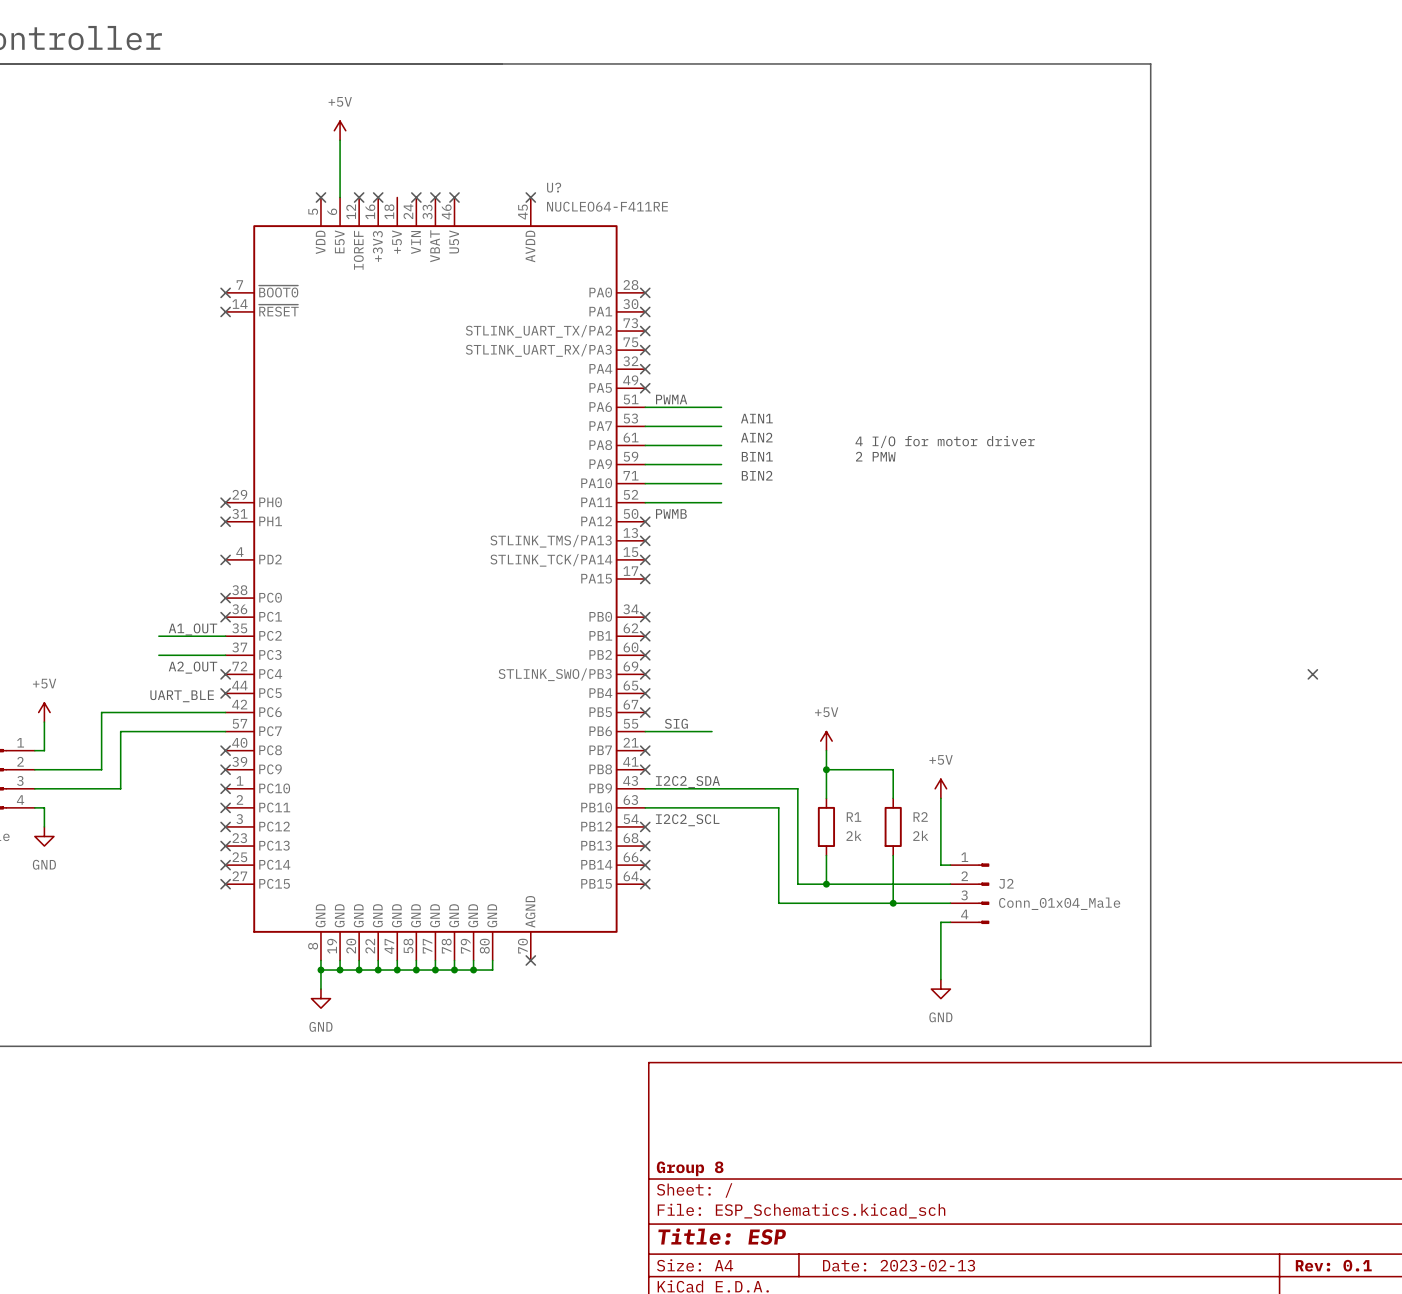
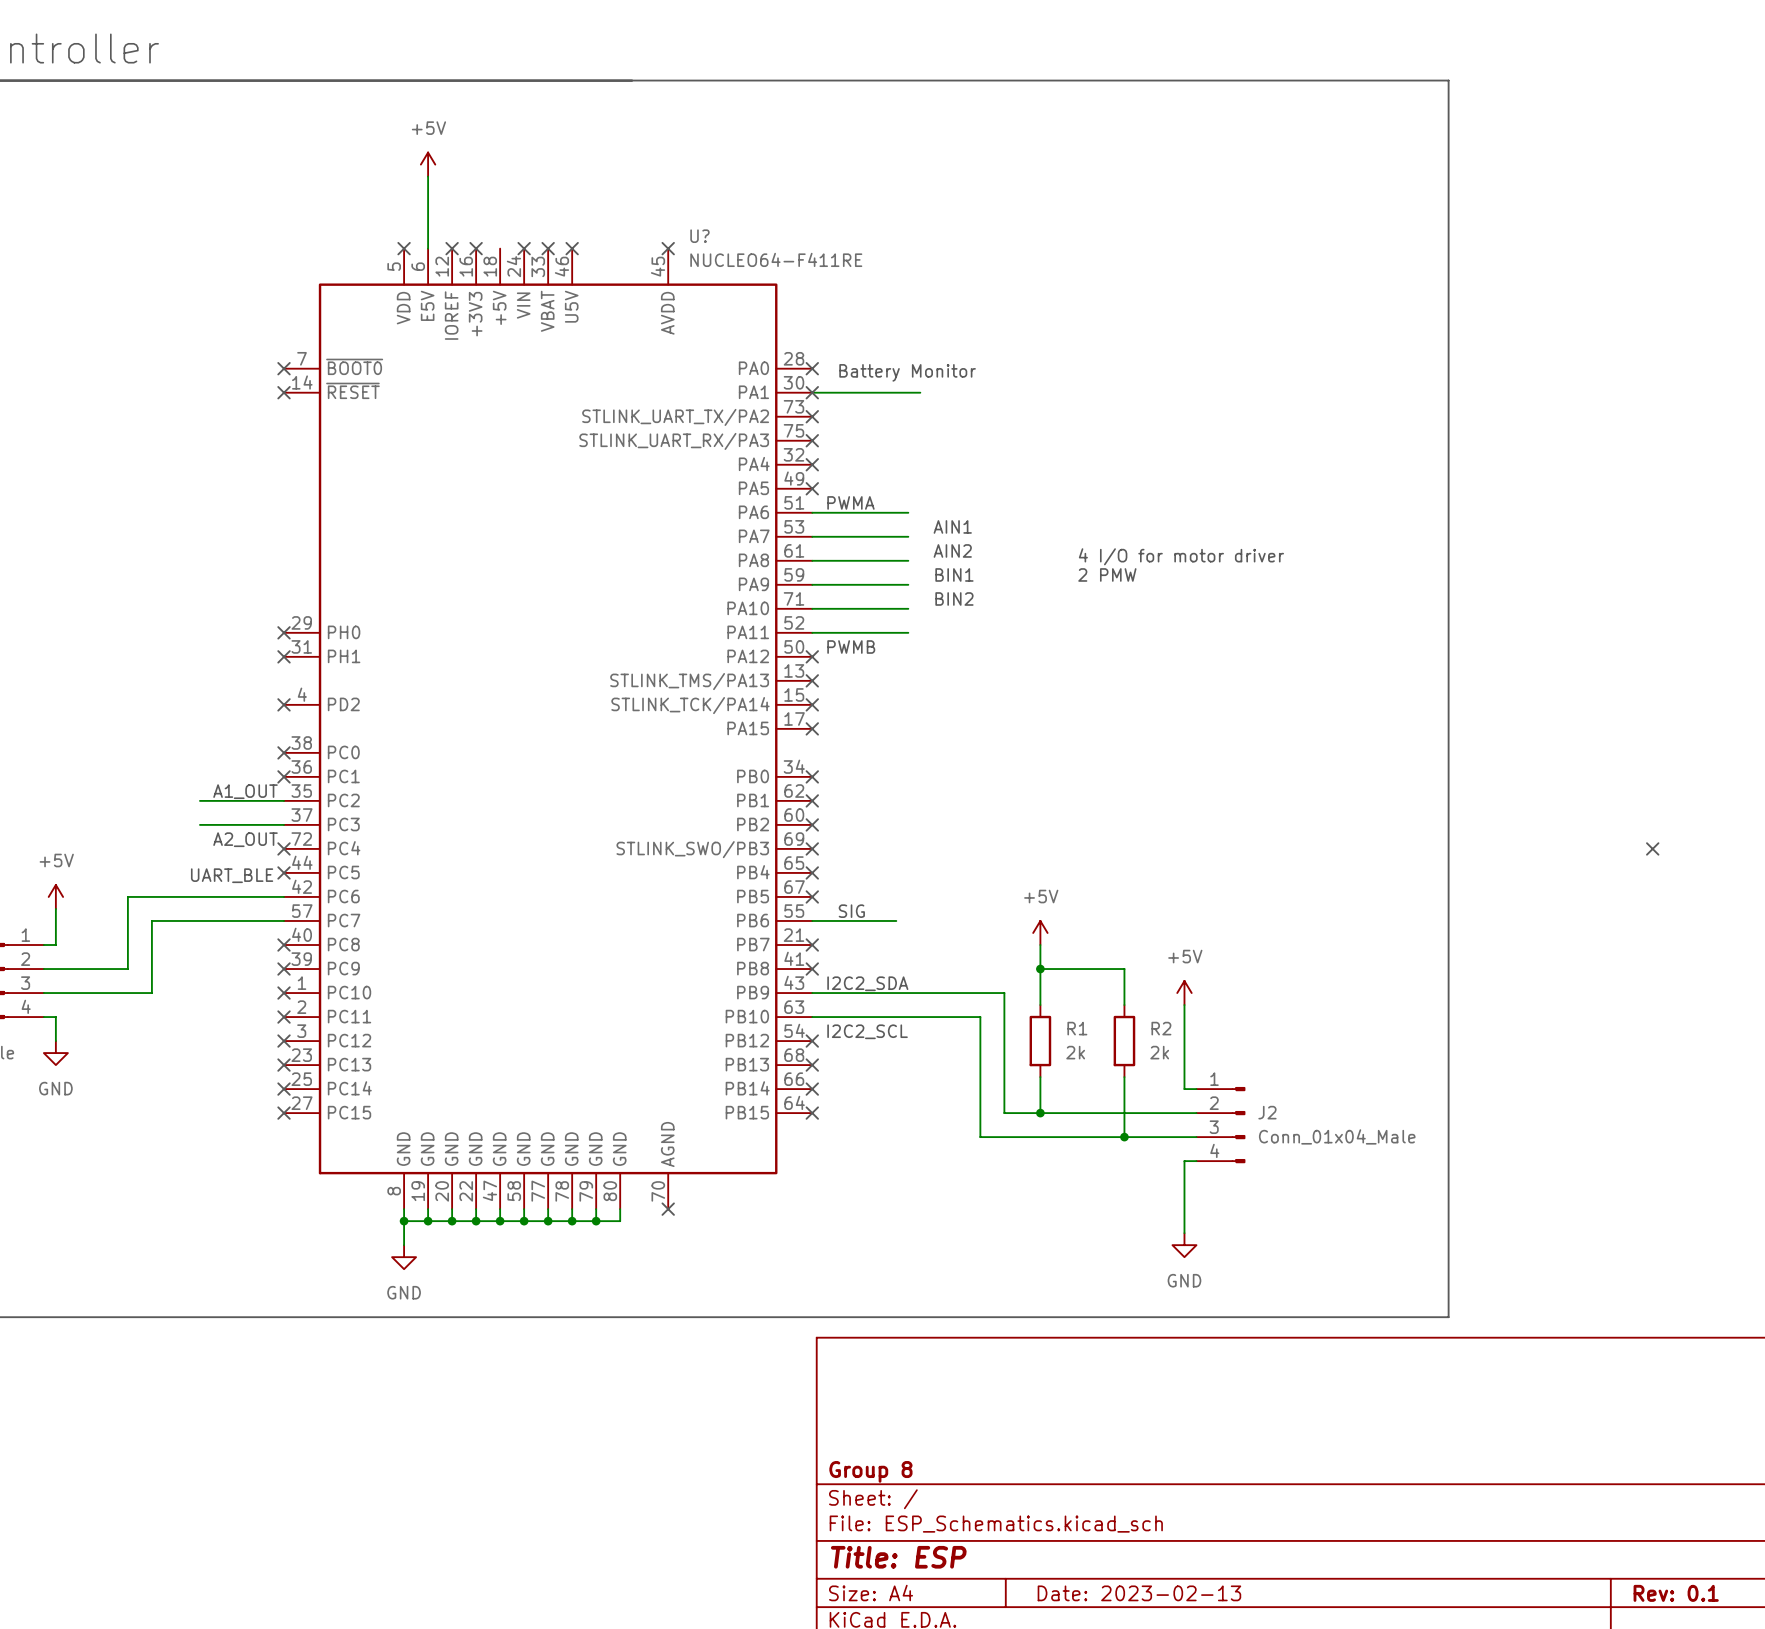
text: none -> Battery Monitor (907, 372)
wire: none -> (812, 392) (920, 392)

